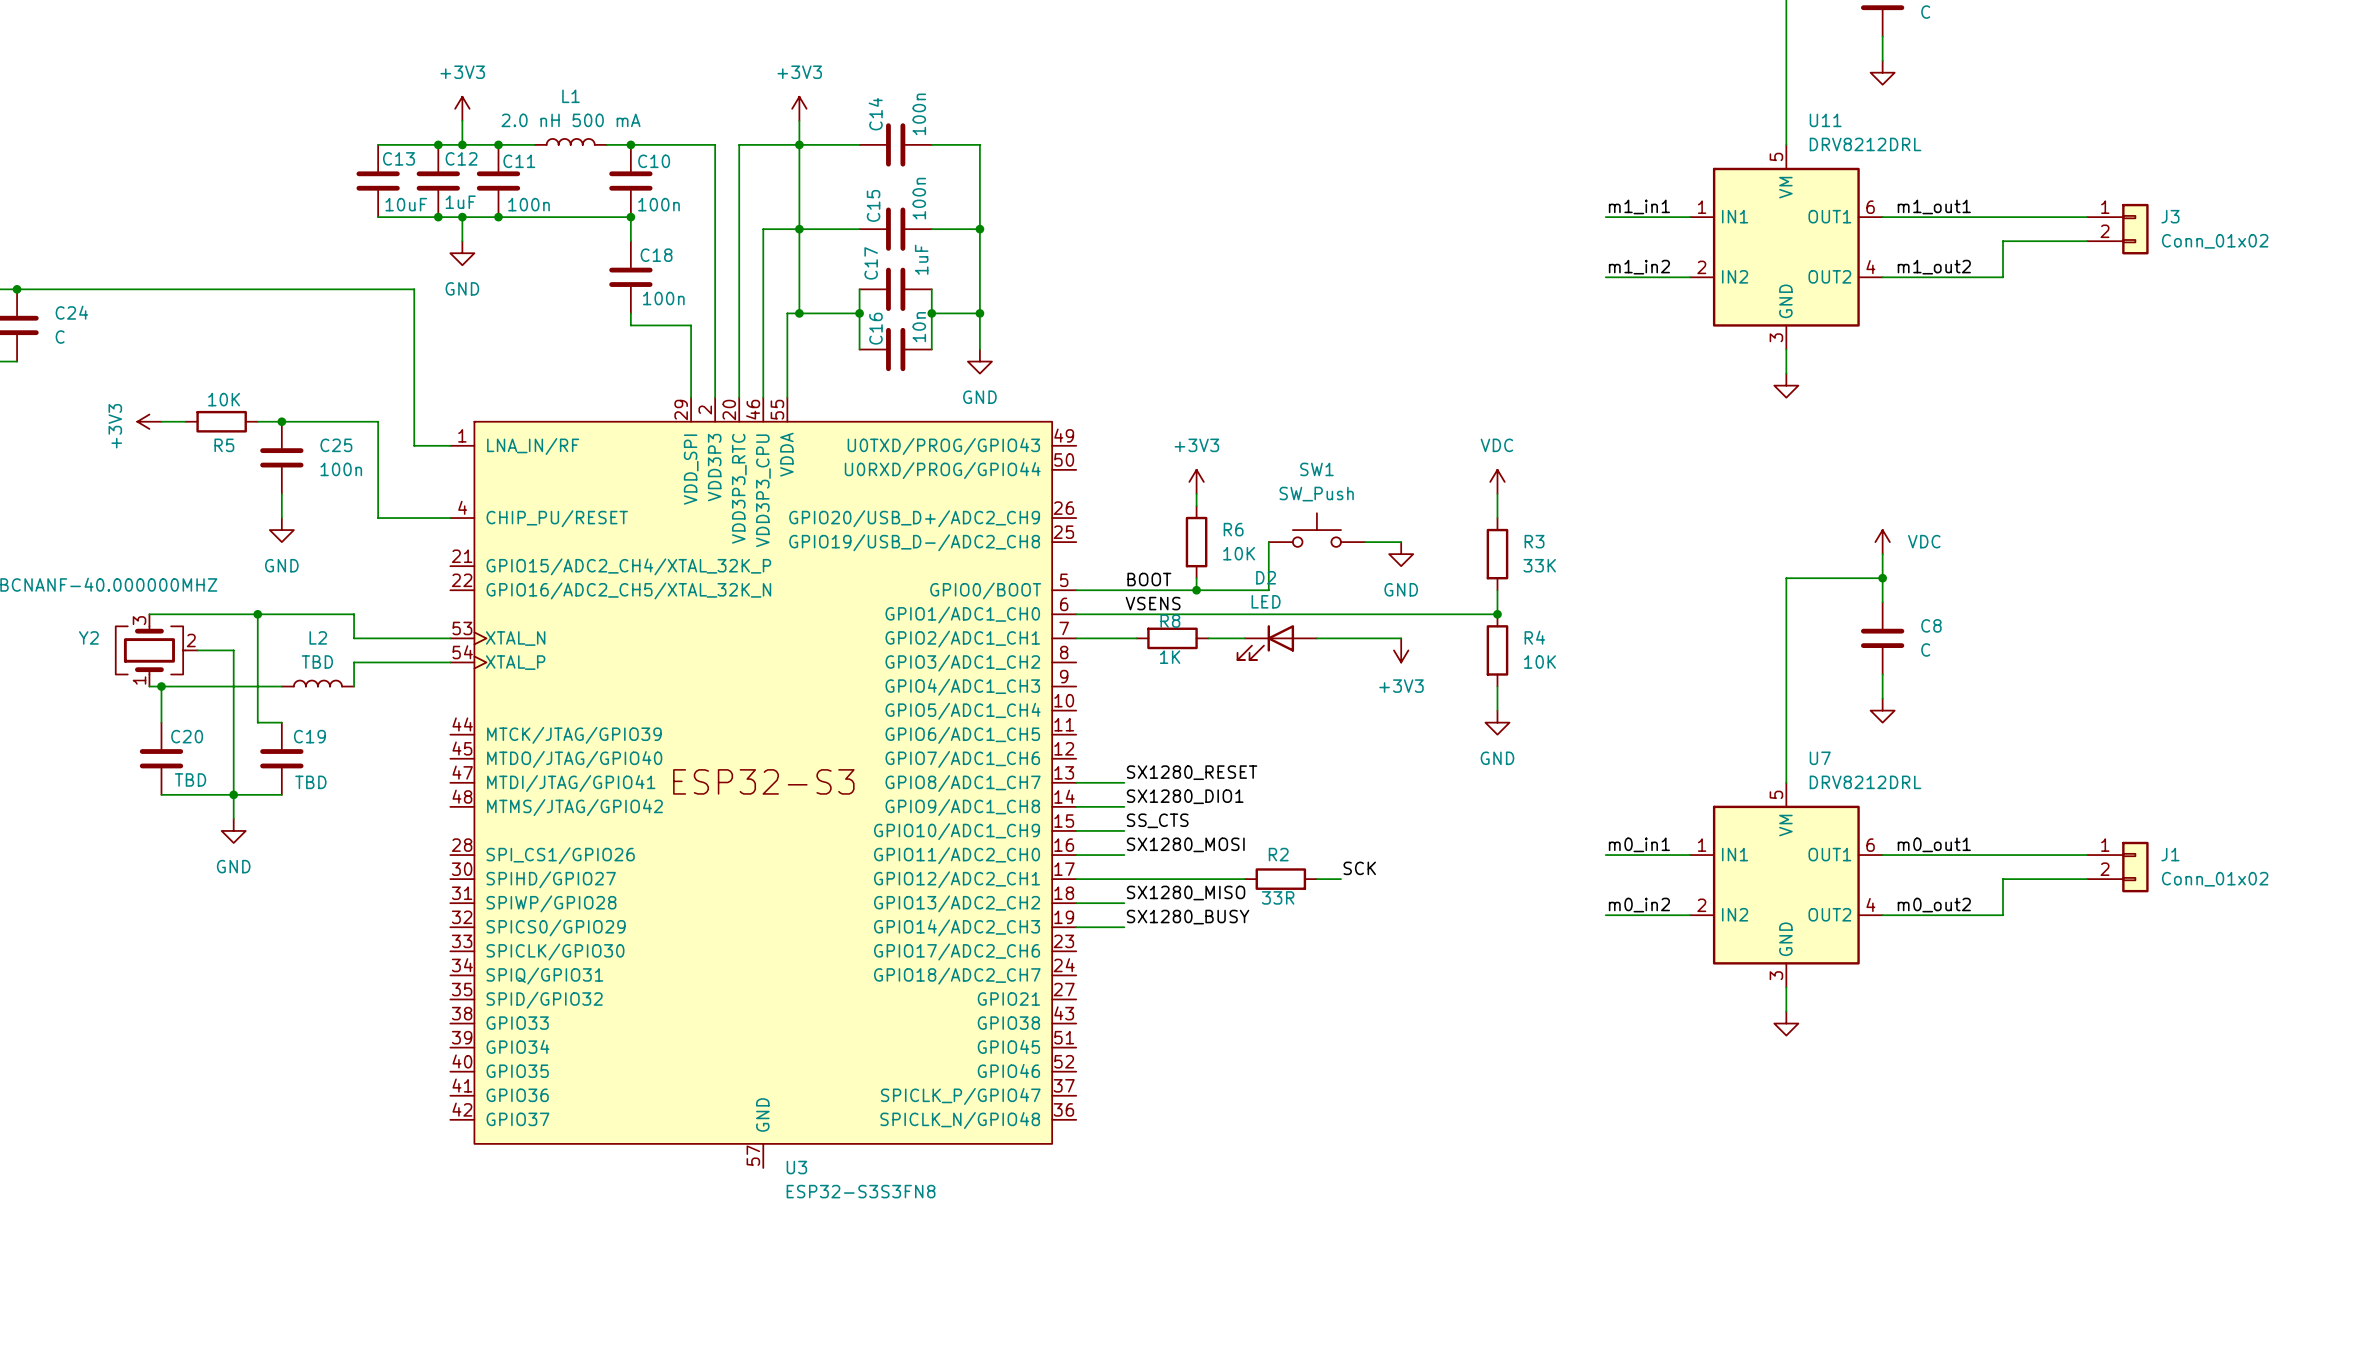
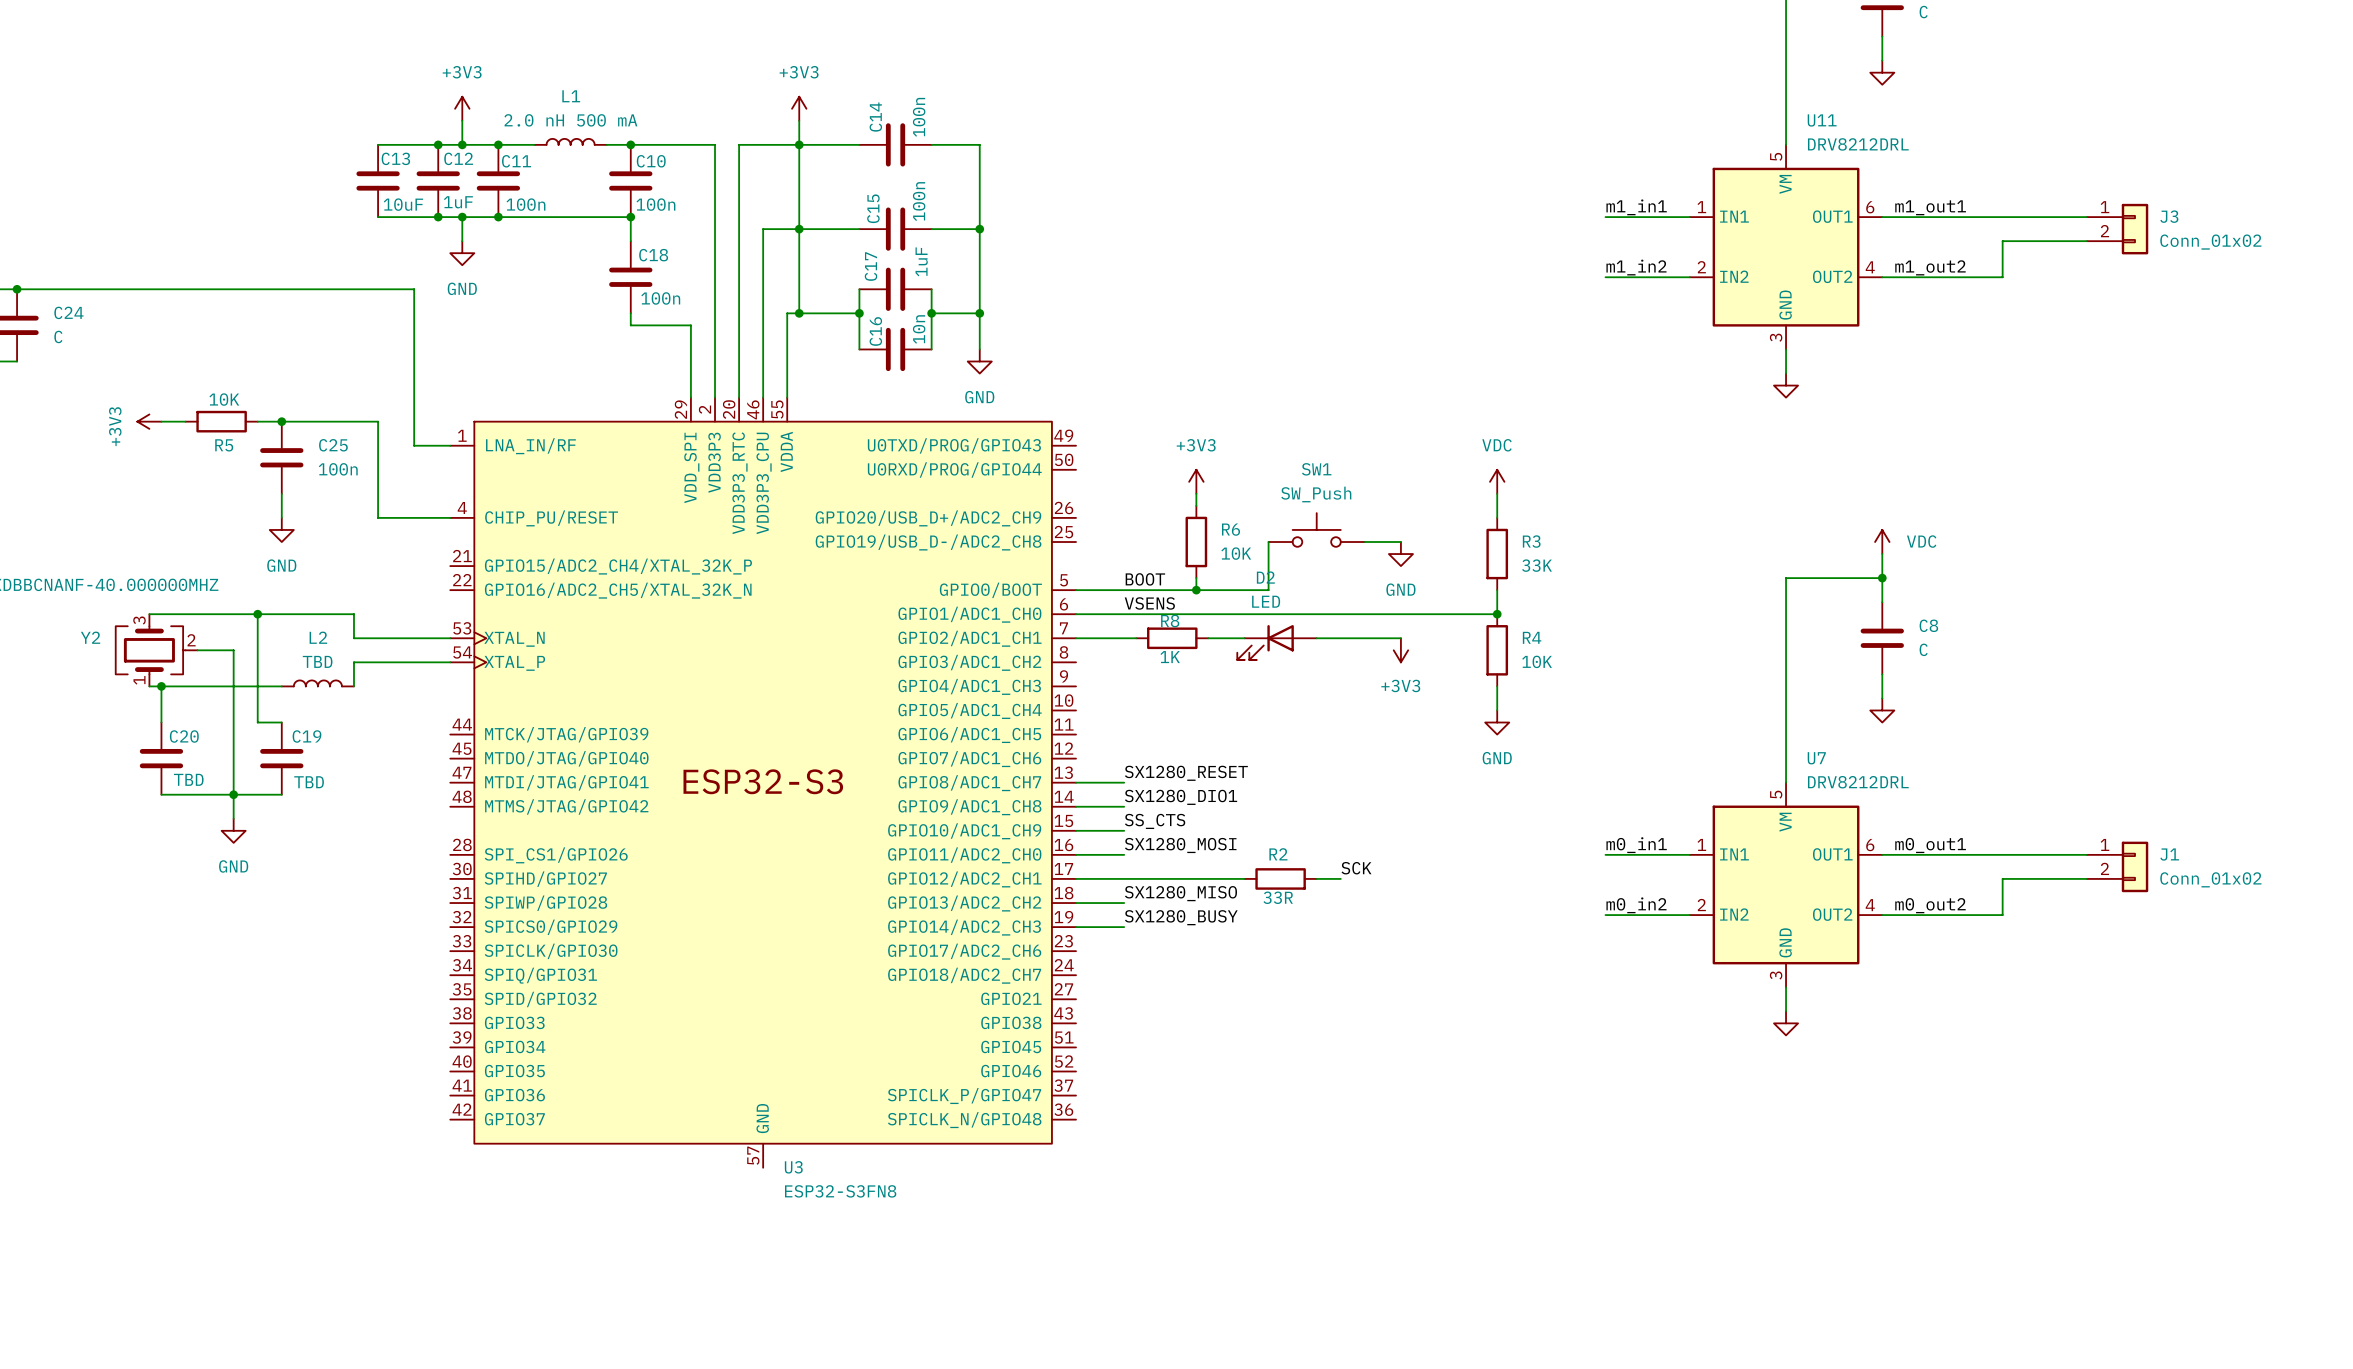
U3 value: ESP32-S3S3FN8 (861, 1191) -> ESP32-S3FN8 (840, 1191)

